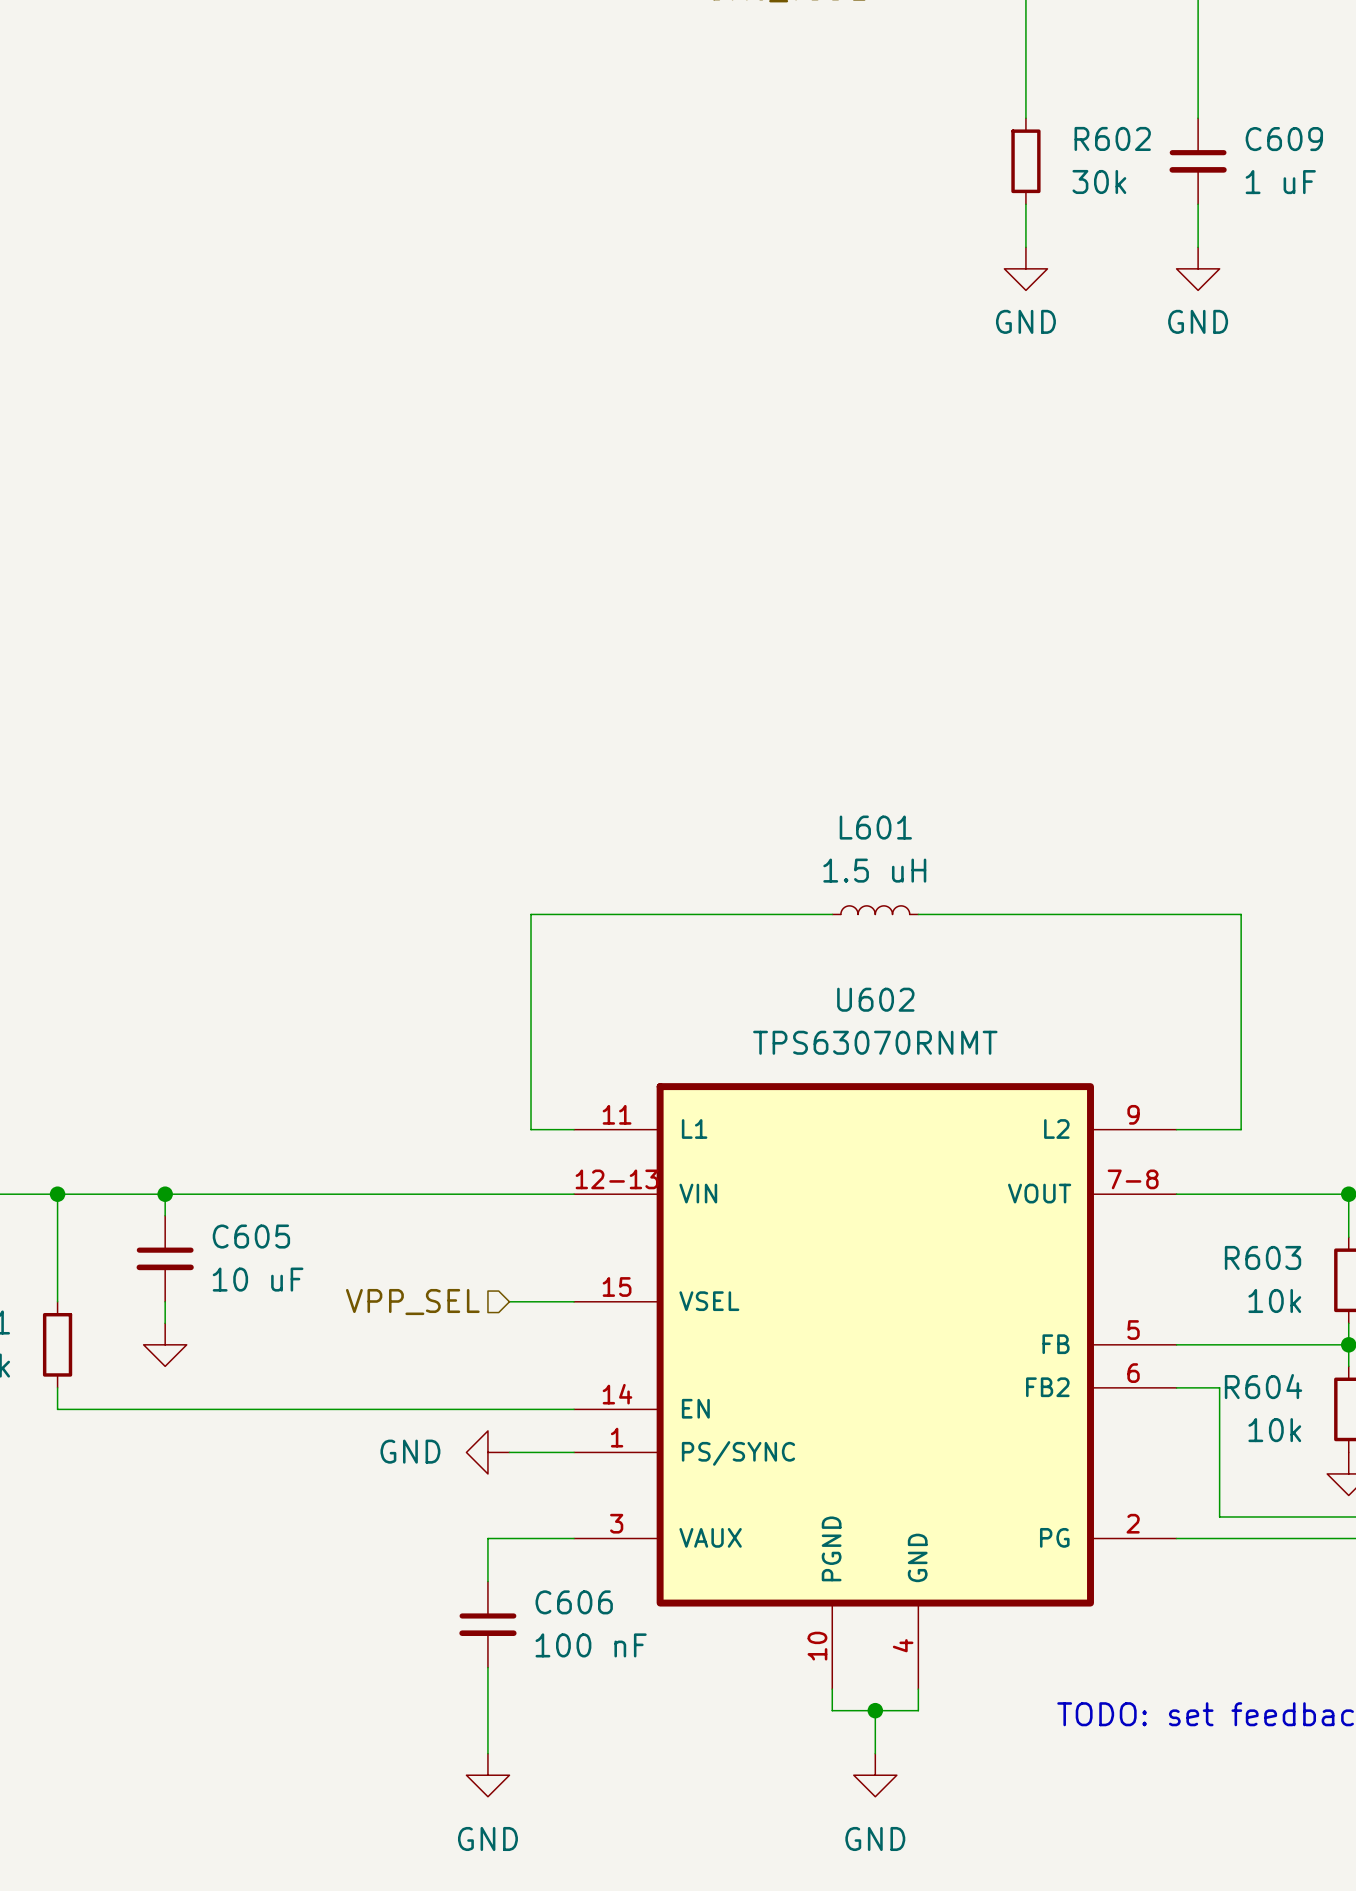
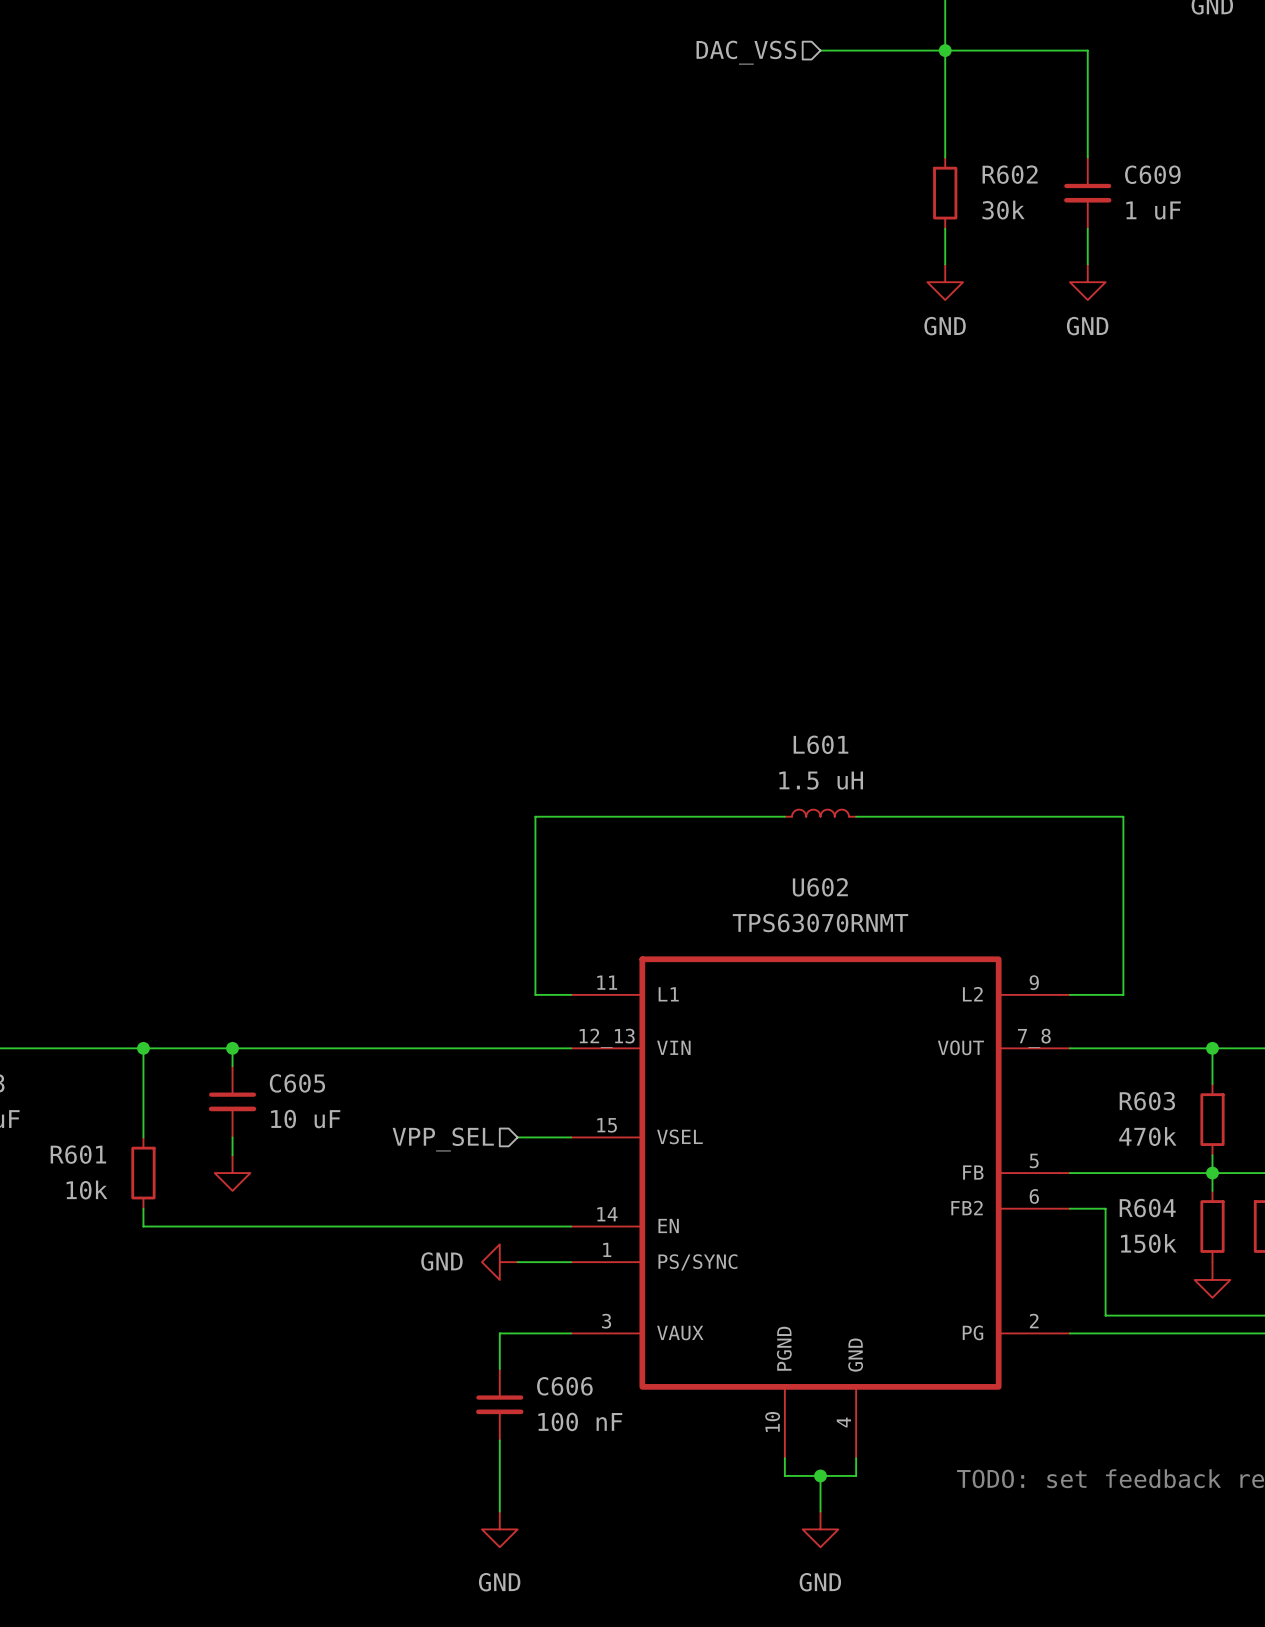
U602 pin number: 12-13 (617, 1179) -> 12_13 (607, 1038)
U602 pin number: 7-8 (1133, 1179) -> 7_8 (1034, 1038)
R603 value: 10k (1274, 1300) -> 470k (1147, 1136)
R604 value: 10k (1274, 1430) -> 150k (1148, 1243)

